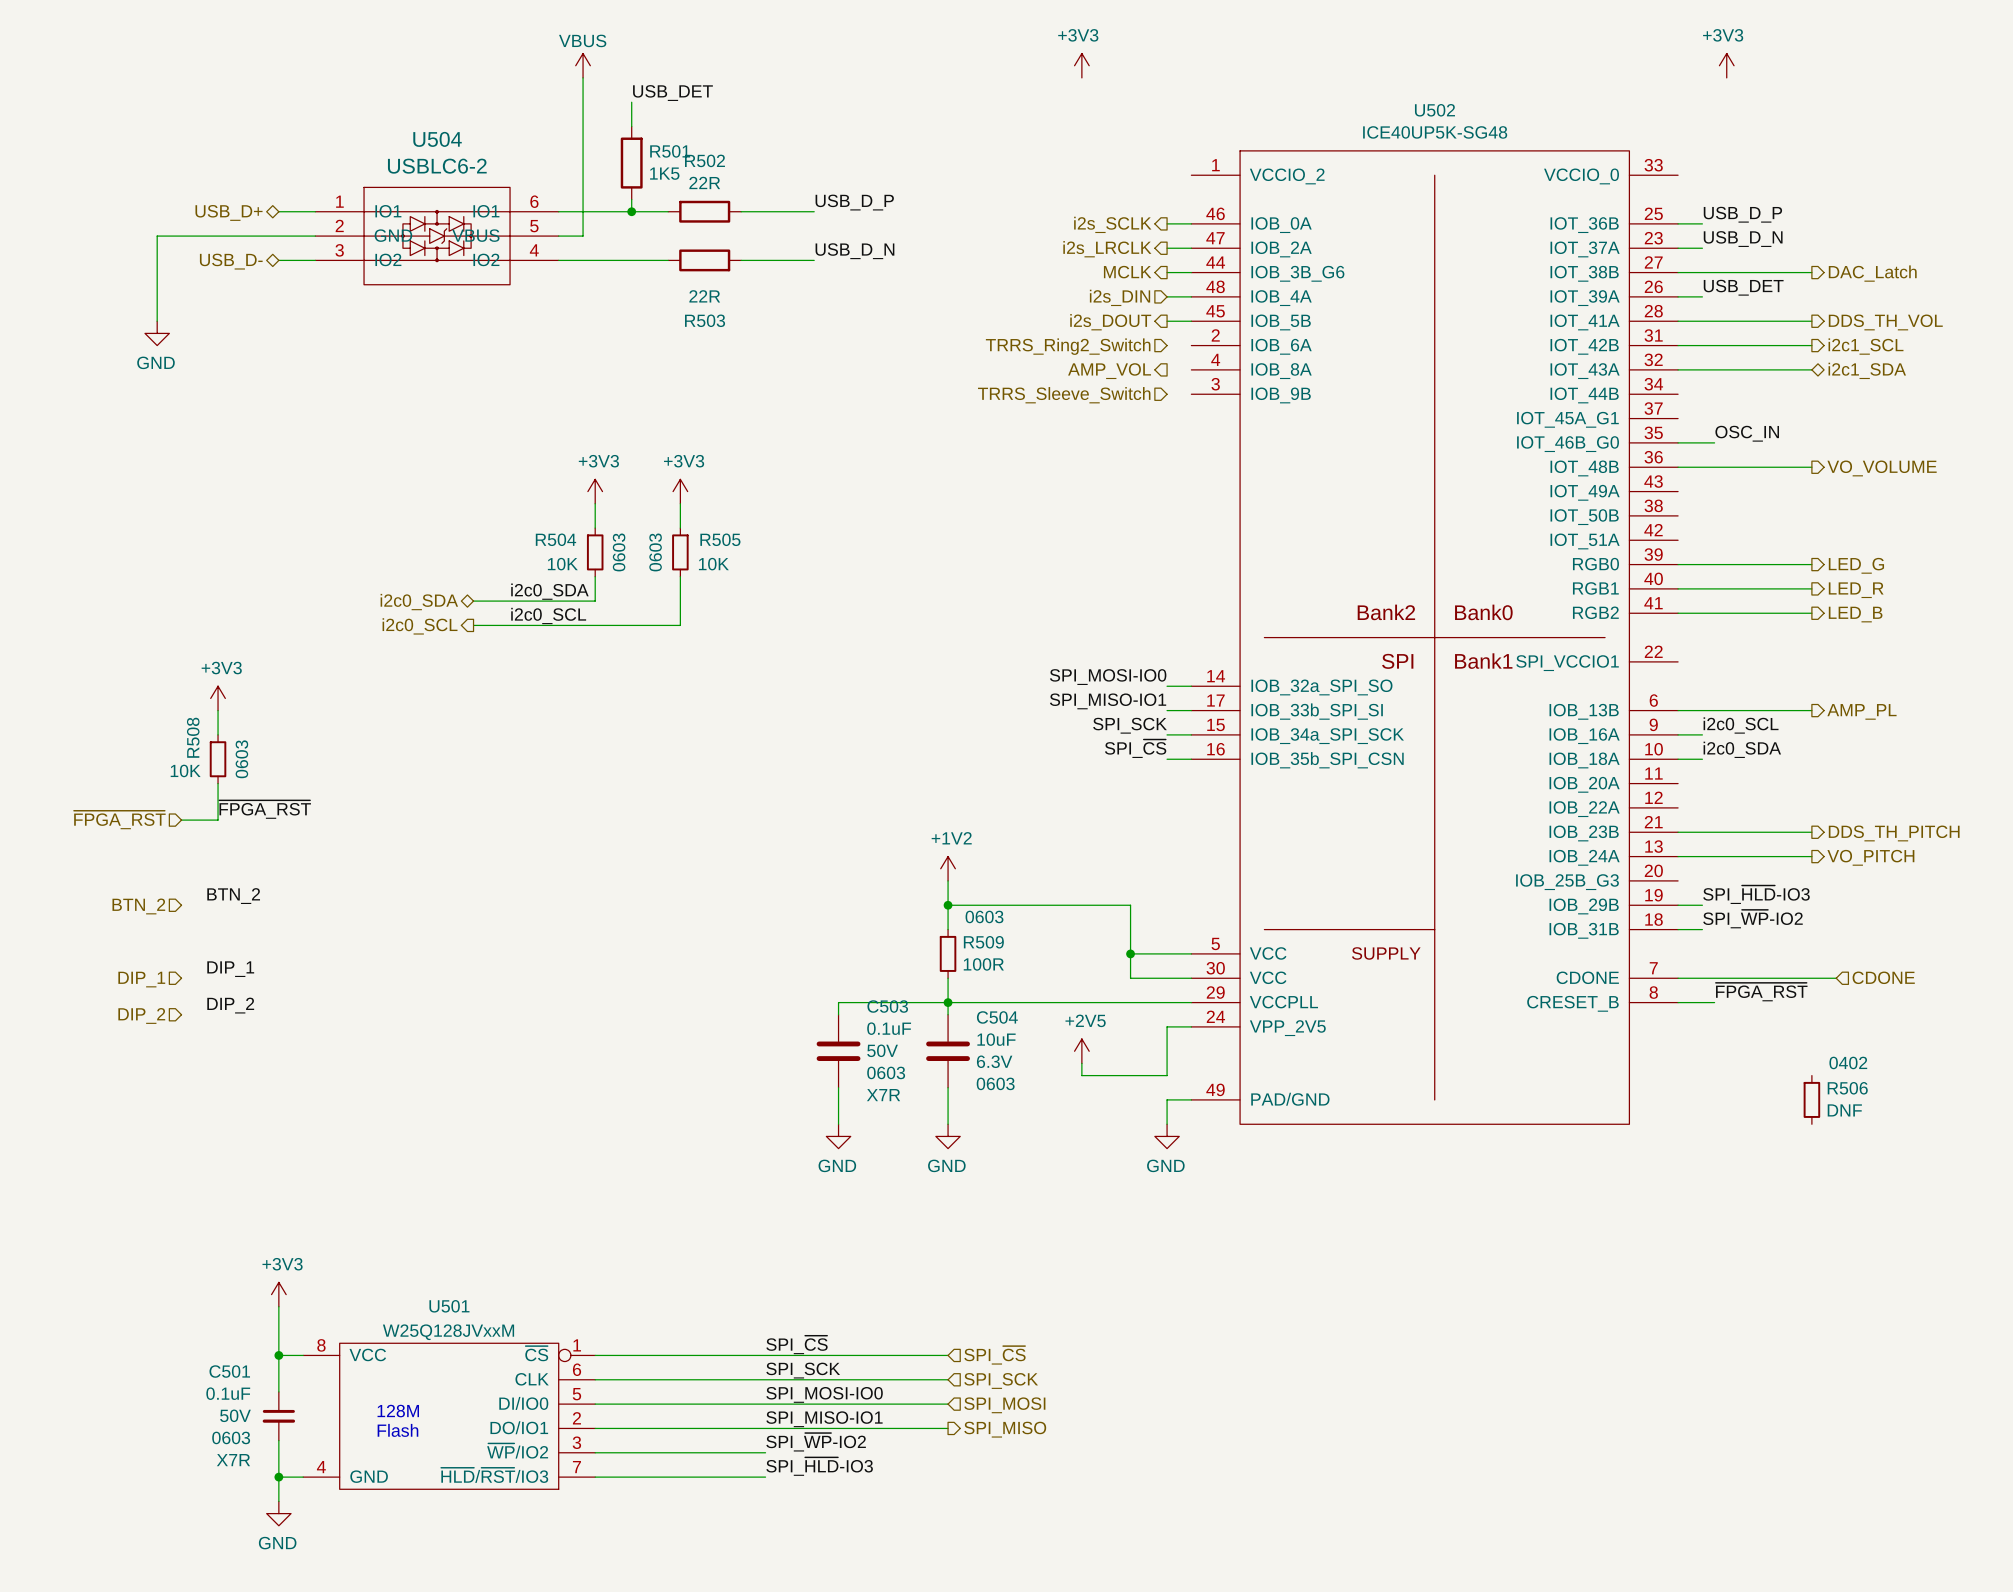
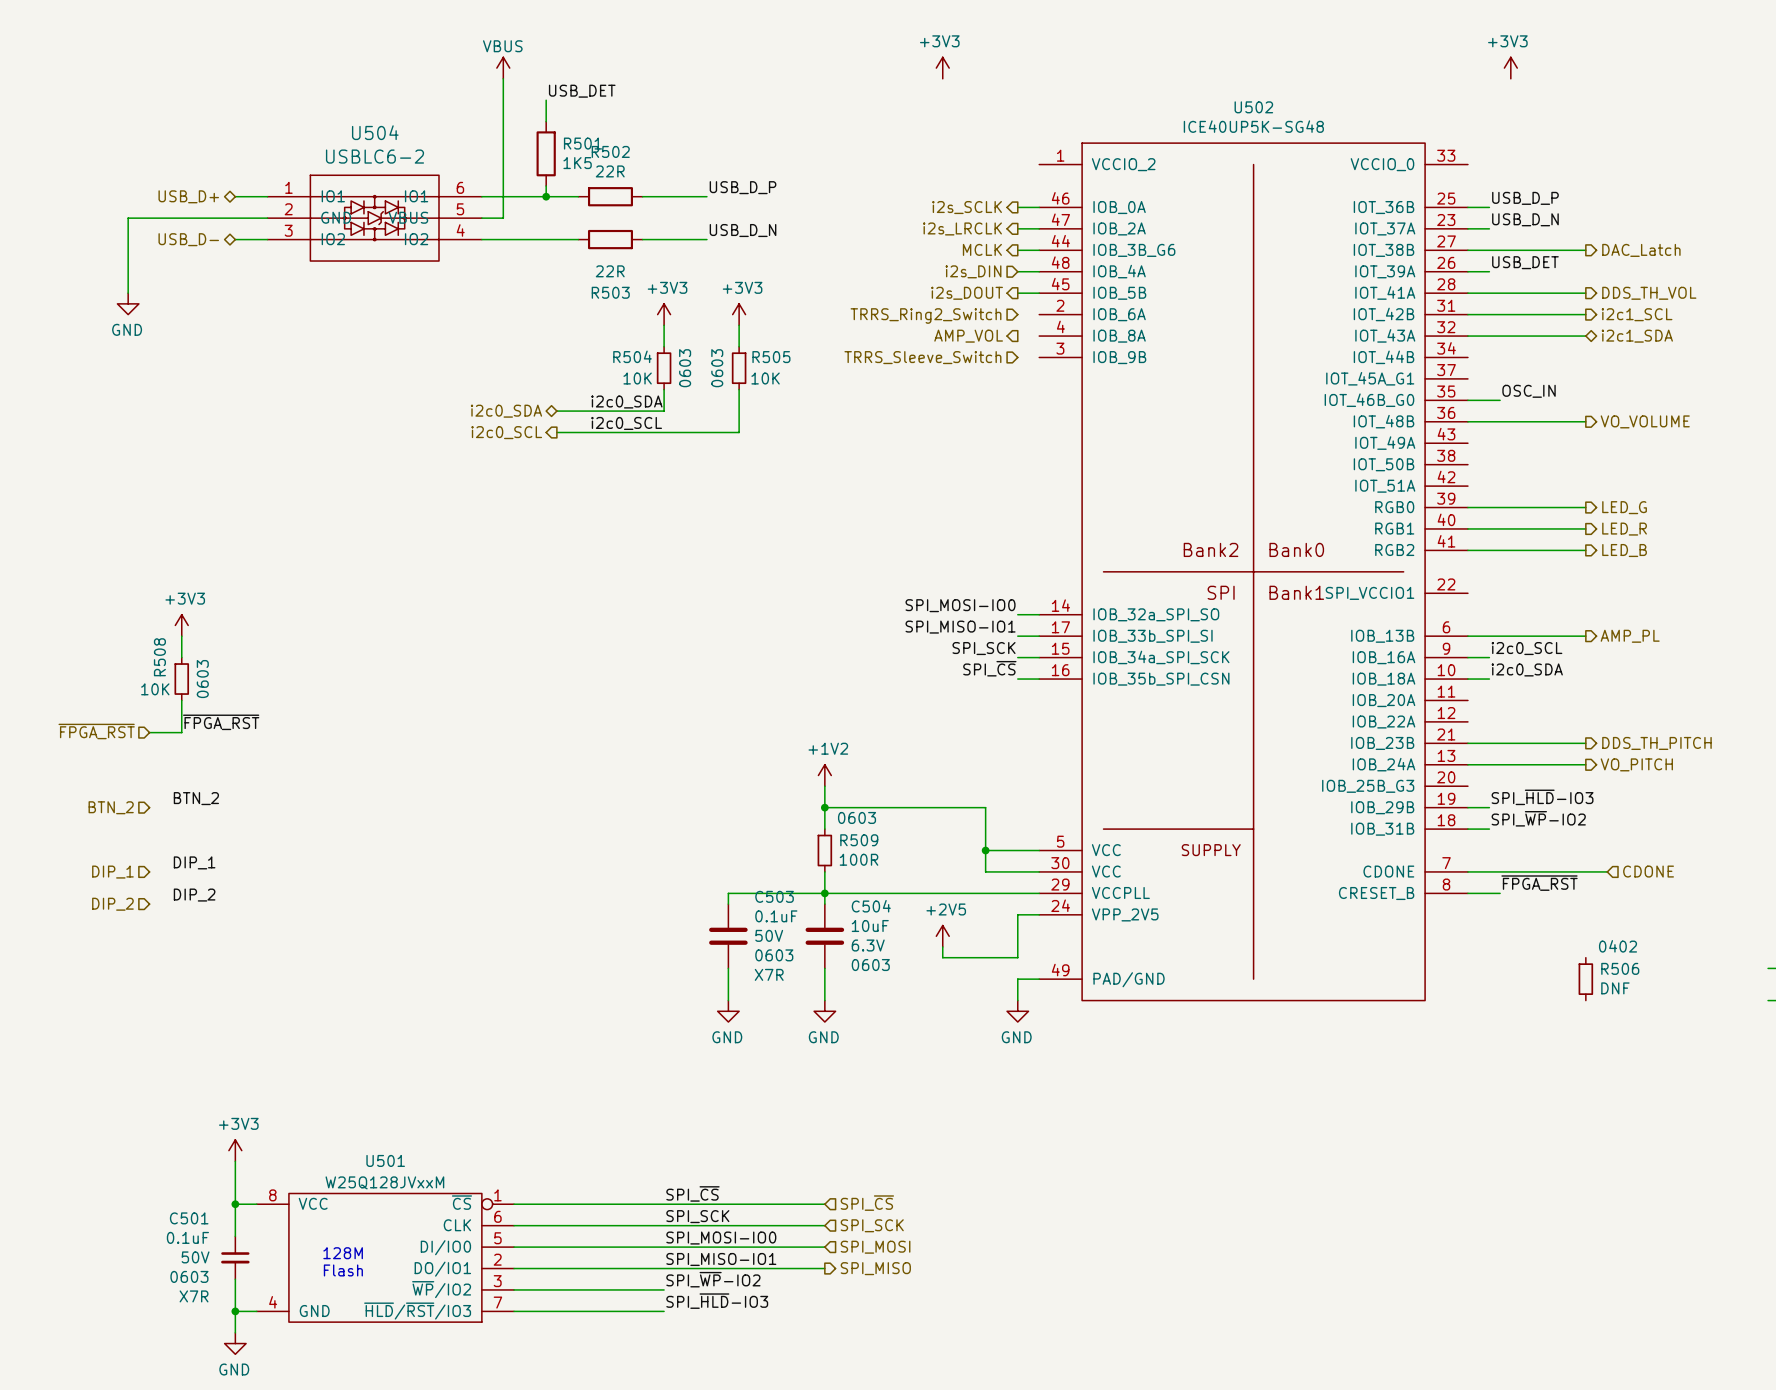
power symbol: none -> +3V3 (664, 314)
power symbol: none -> +3V3 (739, 314)
power symbol: +3V3 (595, 491) -> none
power symbol: +3V3 (680, 491) -> none
wire: (595, 503) (595, 528) -> (664, 325) (664, 346)
wire: (680, 503) (680, 528) -> (739, 325) (739, 346)
R504 position: (595, 552) -> (664, 368)
R505 position: (680, 552) -> (739, 368)
wire: (595, 576) (595, 601) (473, 601) -> (664, 389) (664, 411) (556, 411)
wire: (680, 576) (680, 625) (473, 625) -> (739, 389) (739, 432) (556, 432)
label position: i2c0_SDA (549, 591) -> i2c0_SDA (626, 402)
hierarchical label position: i2c0_SDA (419, 602) -> i2c0_SDA (506, 411)
label position: i2c0_SCL (548, 615) -> i2c0_SCL (626, 423)
hierarchical label position: i2c0_SCL (420, 626) -> i2c0_SCL (506, 432)

